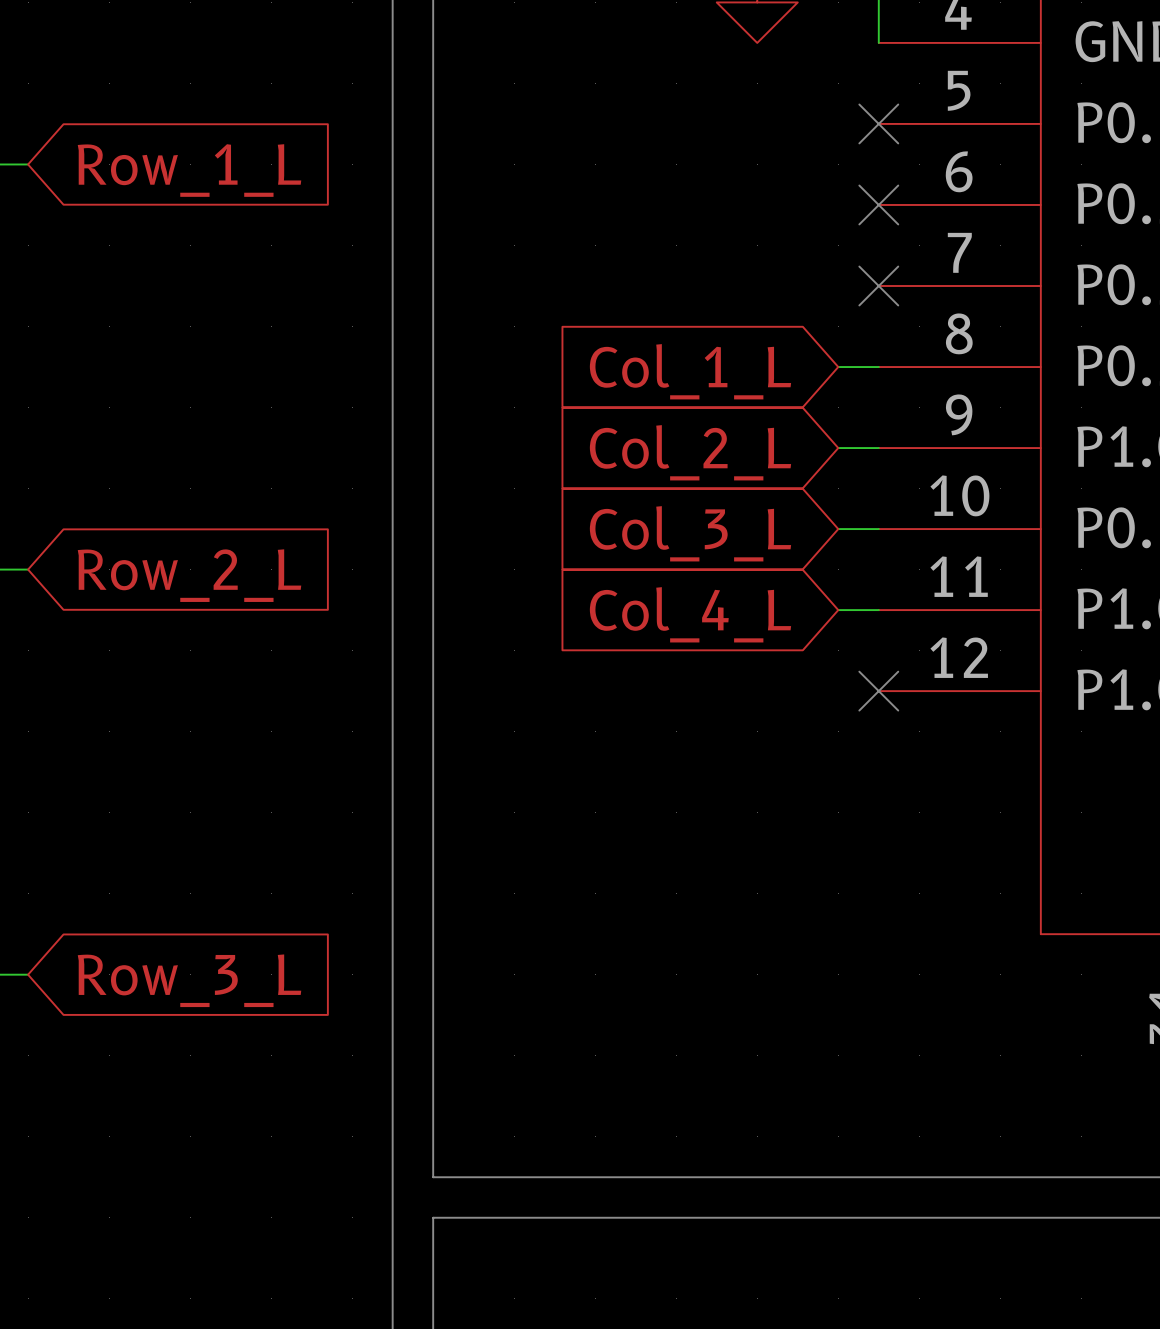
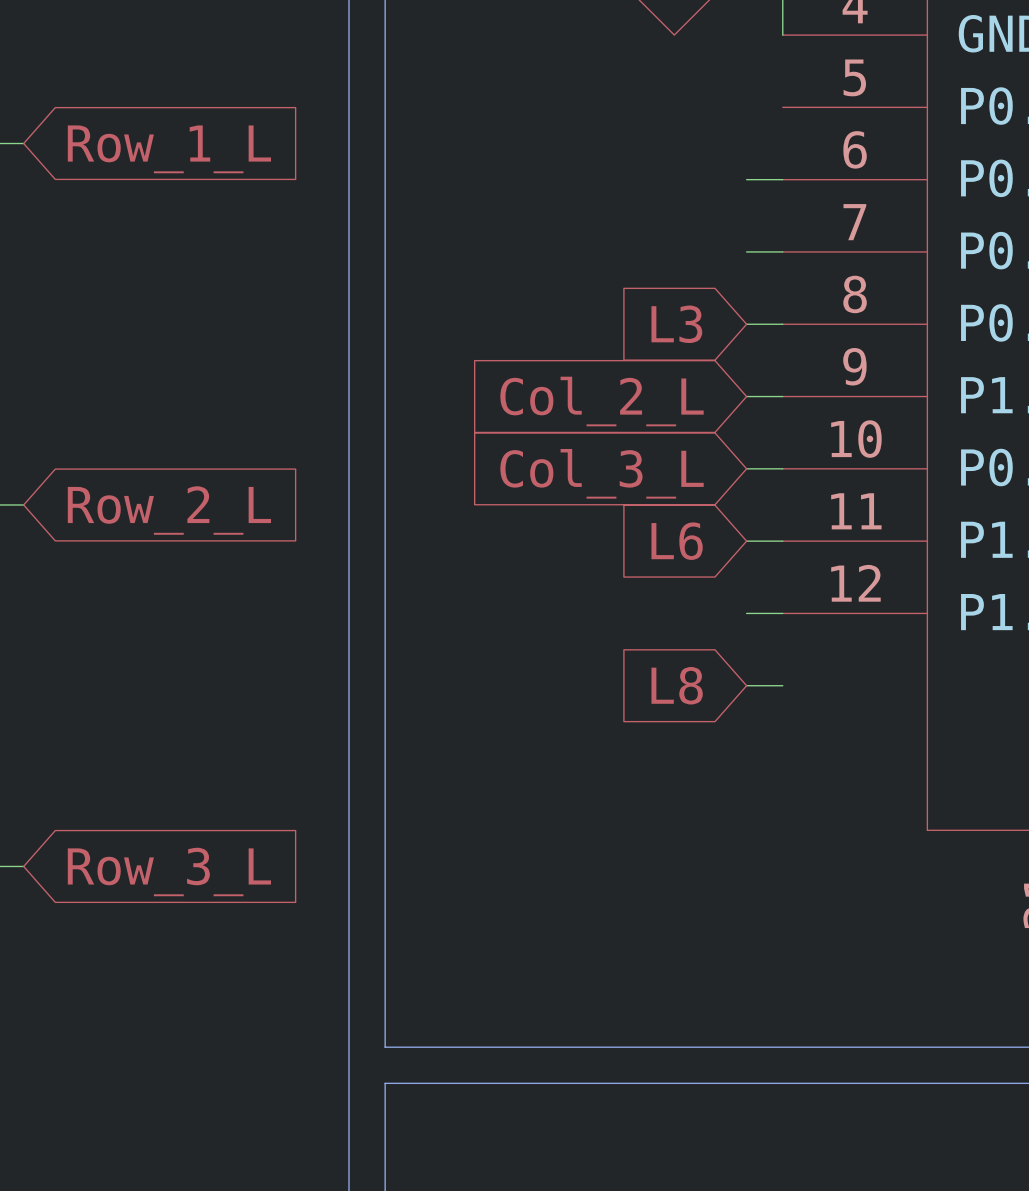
no-connect mark: (878, 123) -> none
wire: none -> (746, 179) (782, 179)
no-connect mark: (878, 204) -> none
wire: none -> (746, 251) (782, 251)
no-connect mark: (878, 286) -> none
global label: Col_1_L (690, 371) -> L3 (676, 324)
global label: Col_4_L (690, 614) -> L6 (677, 541)
wire: none -> (746, 613) (782, 613)
no-connect mark: (878, 691) -> none
global label: none -> L8 (677, 685)
wire: none -> (746, 685) (782, 685)

